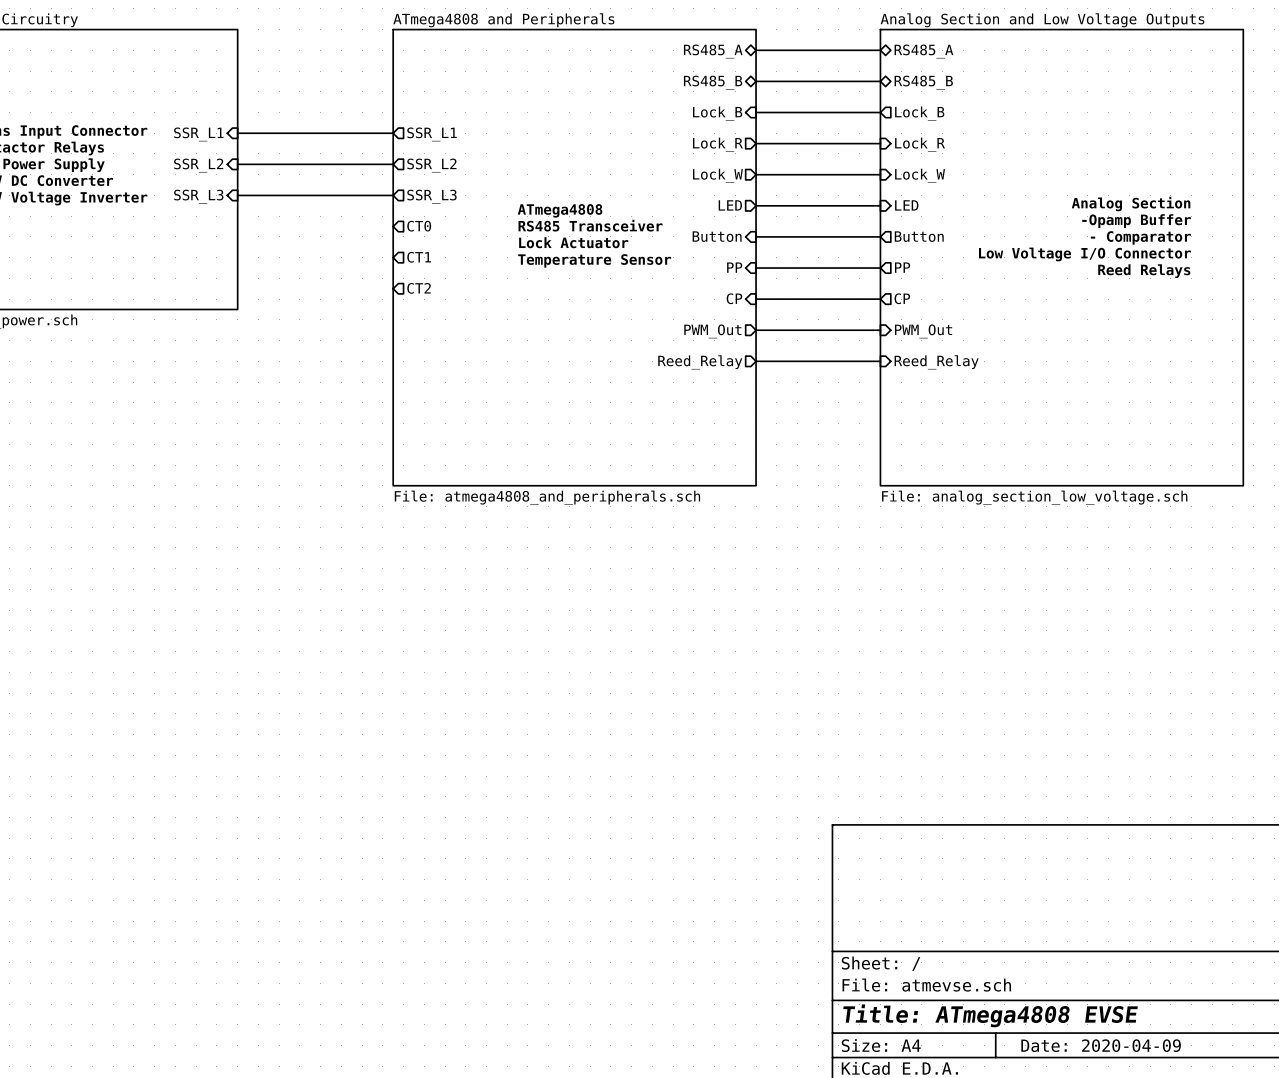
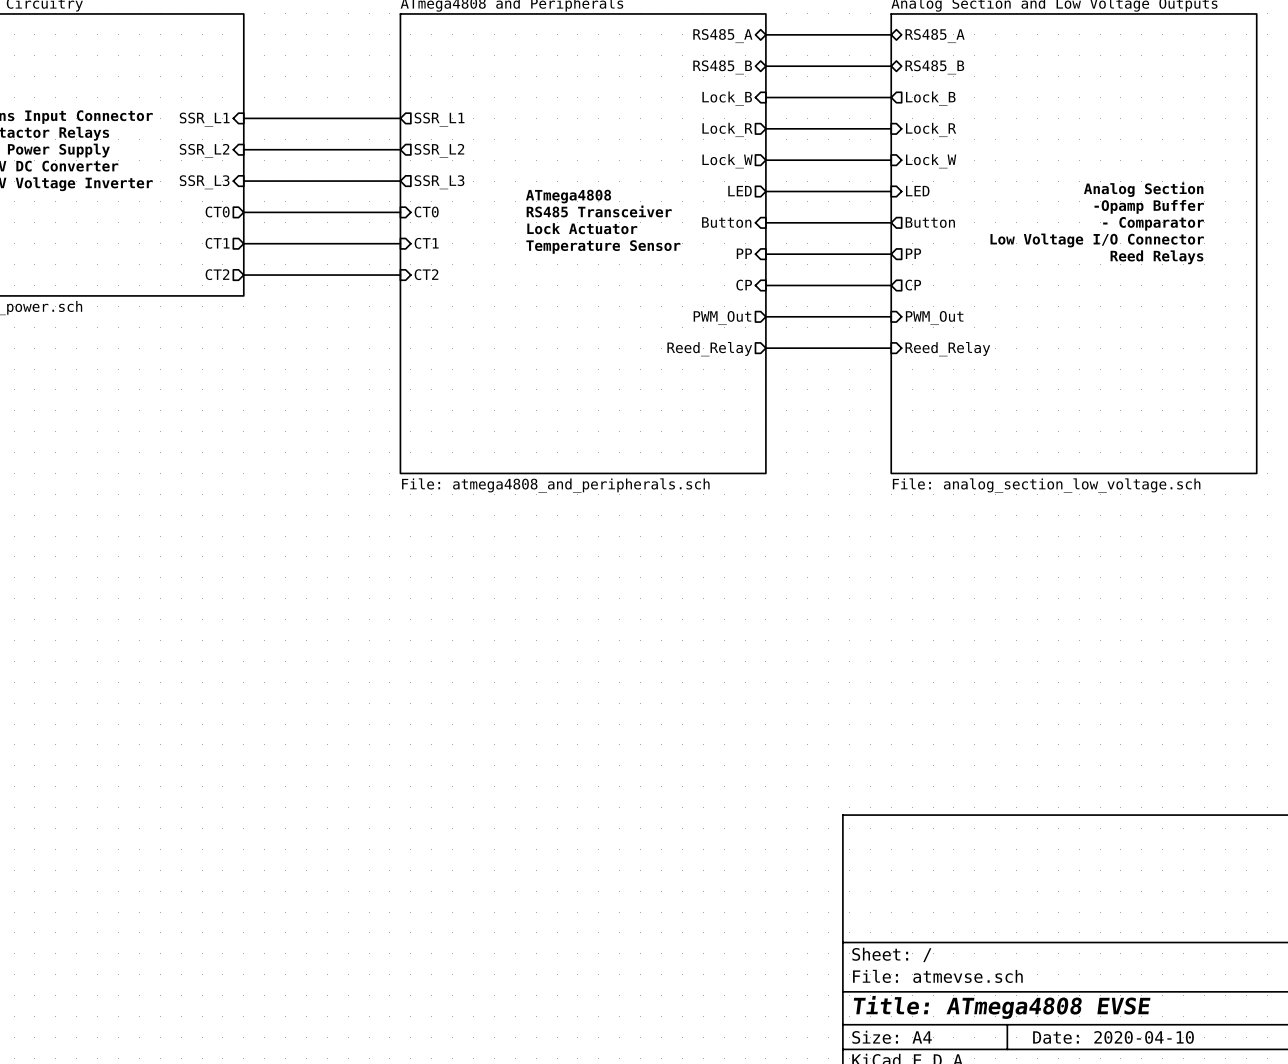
sheet pin: none -> CT0 (217, 212)
wire: none -> (243, 212) (400, 212)
sheet pin shape: output (419, 226) -> input (426, 212)
sheet pin: none -> CT1 (217, 243)
wire: none -> (243, 243) (400, 243)
sheet pin shape: output (419, 257) -> input (426, 243)
sheet pin: none -> CT2 (217, 274)
wire: none -> (243, 275) (400, 275)
sheet pin shape: output (419, 288) -> input (426, 274)
title block: Date: 2020-04-09 (1101, 1045) -> Date: 2020-04-10 (1113, 1037)

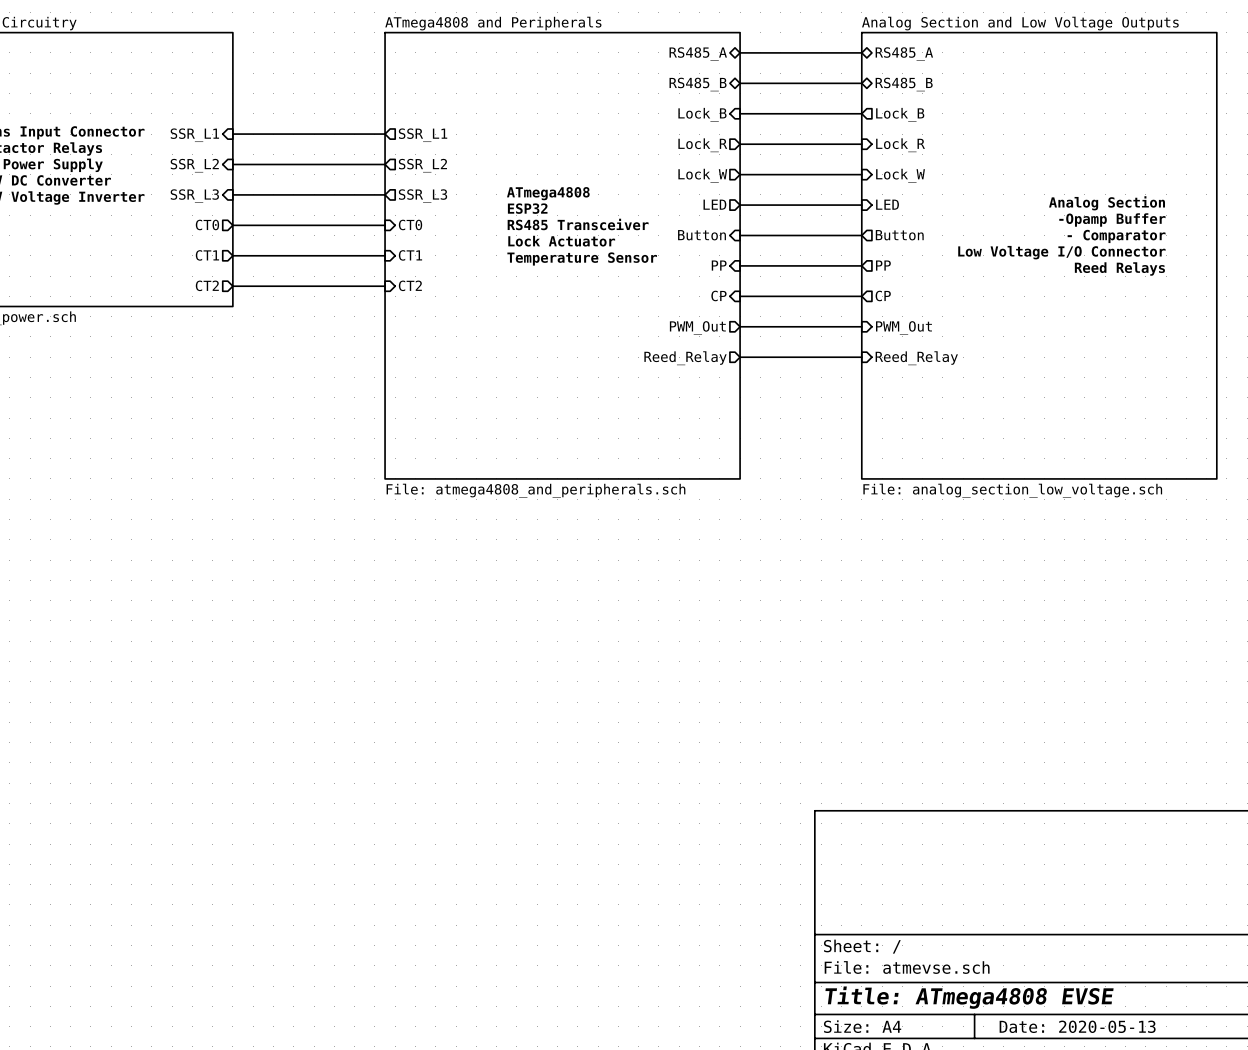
text: none -> ATmega4808 (548, 193)
text: ATmega4808 (568, 196) -> ESP32 (527, 208)
title block: Date: 2020-04-10 (1113, 1037) -> Date: 2020-05-13 (1077, 1026)

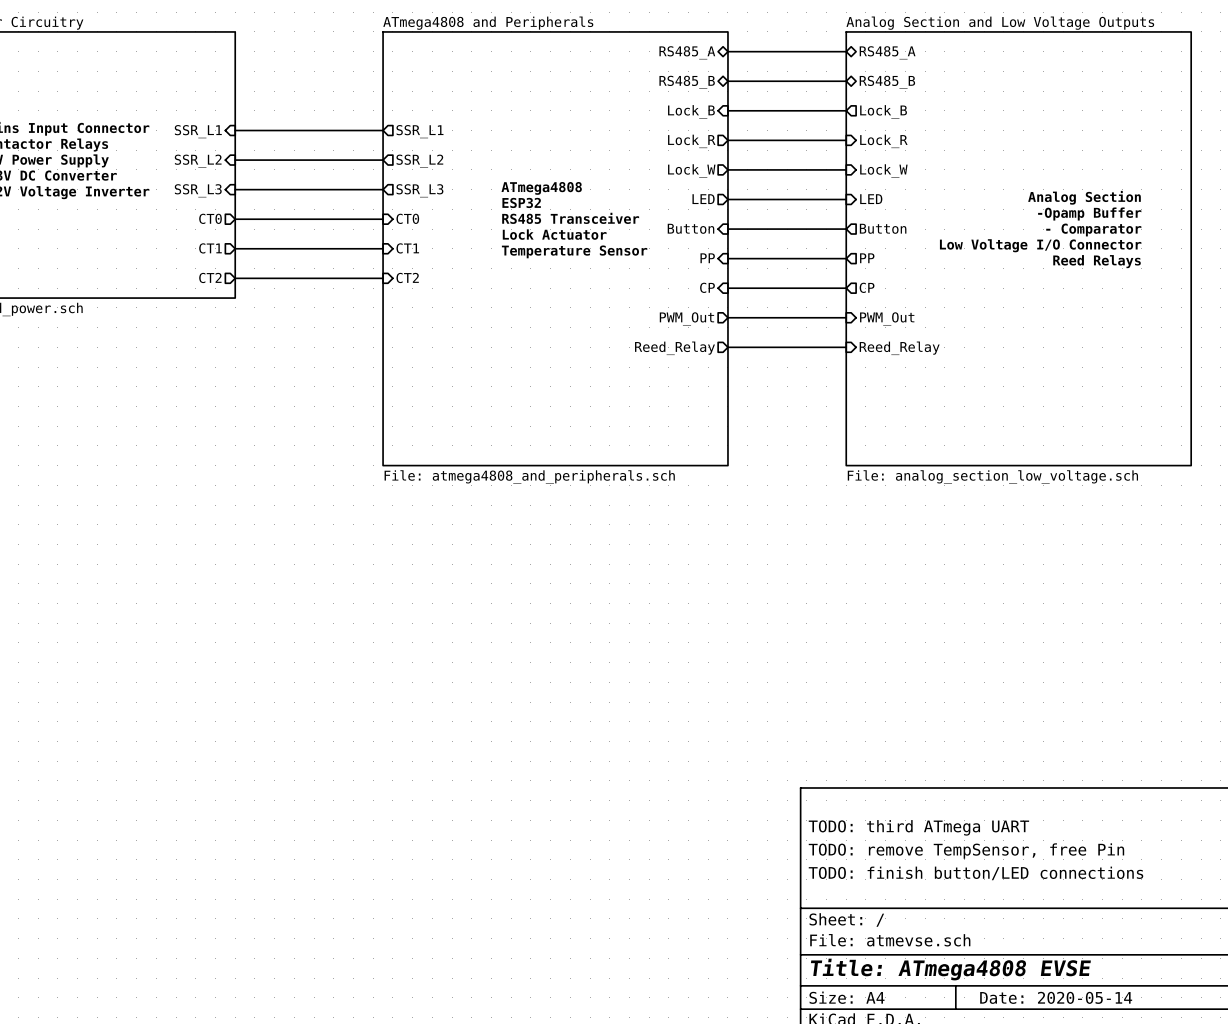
title block: none -> TODO: third ATmega UART (918, 827)
title block: none -> TODO: remove TempSensor, free Pin (966, 851)
title block: none -> TODO: finish button/LED connections (975, 873)
title block: Date: 2020-05-13 (1077, 1026) -> Date: 2020-05-14 (1056, 997)

